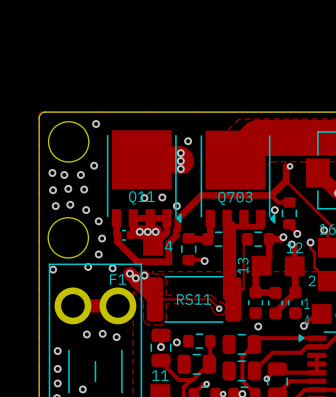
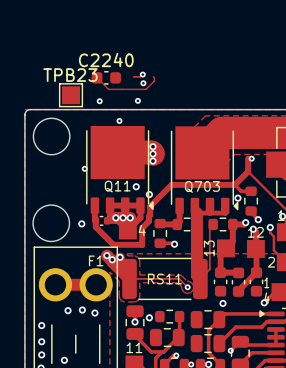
track: none -> (142, 74) (140, 76) (133, 76)
via: none -> (142, 74)
track: none -> (153, 76) (154, 80) (146, 89) (108, 89) (97, 77)
C2240: none -> (106, 77)
via: none -> (143, 83)
TPB23: none -> (71, 95)
via: none -> (99, 101)
via: none -> (137, 100)
via: (96, 124) -> none
via: none -> (119, 120)
via: (188, 141) -> none
via: (94, 165) -> none
via: (52, 172) -> none
via: (64, 174) -> none
via: (80, 174) -> none
via: none -> (84, 168)
via: (68, 188) -> none
via: (84, 189) -> none
via: (53, 190) -> none
via: (144, 198) -> none
via: (70, 204) -> none
via: (55, 206) -> none
via: (86, 210) -> none
via: (98, 221) -> none
via: (98, 254) -> none
via: (88, 266) -> none
via: (112, 268) -> none
via: (53, 269) -> none

